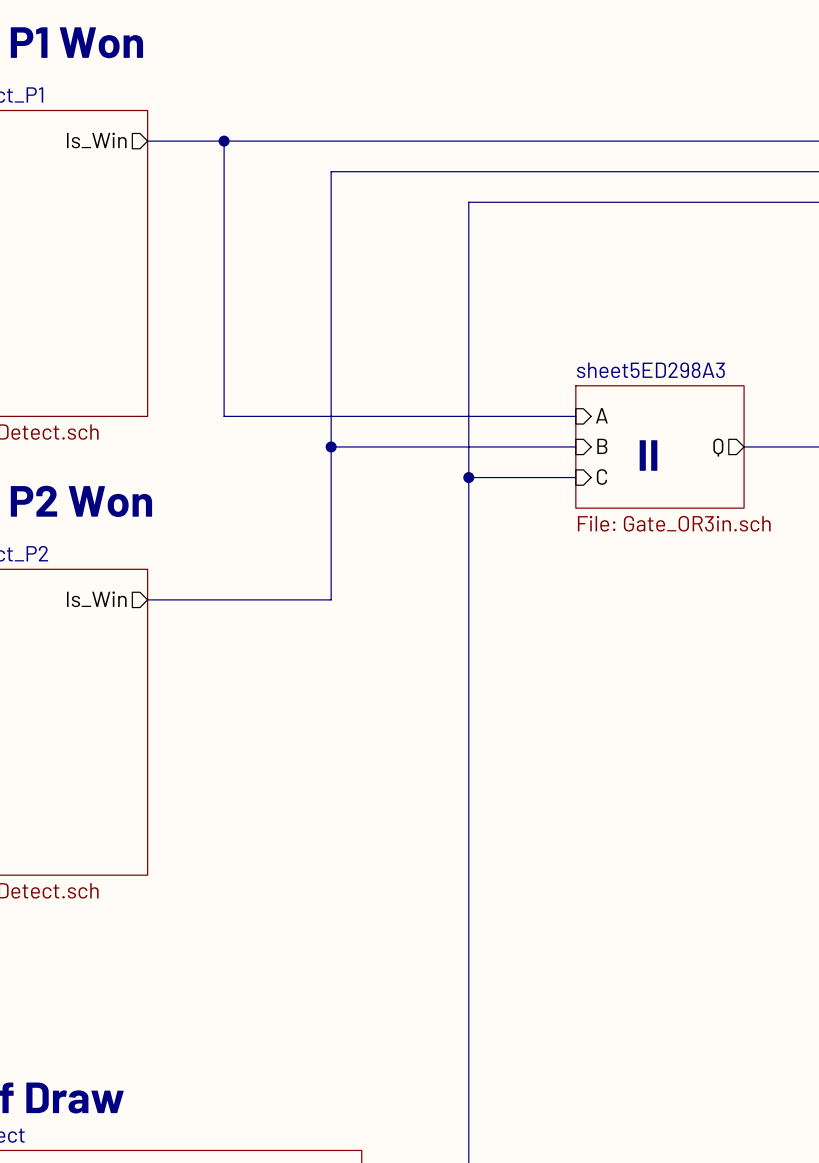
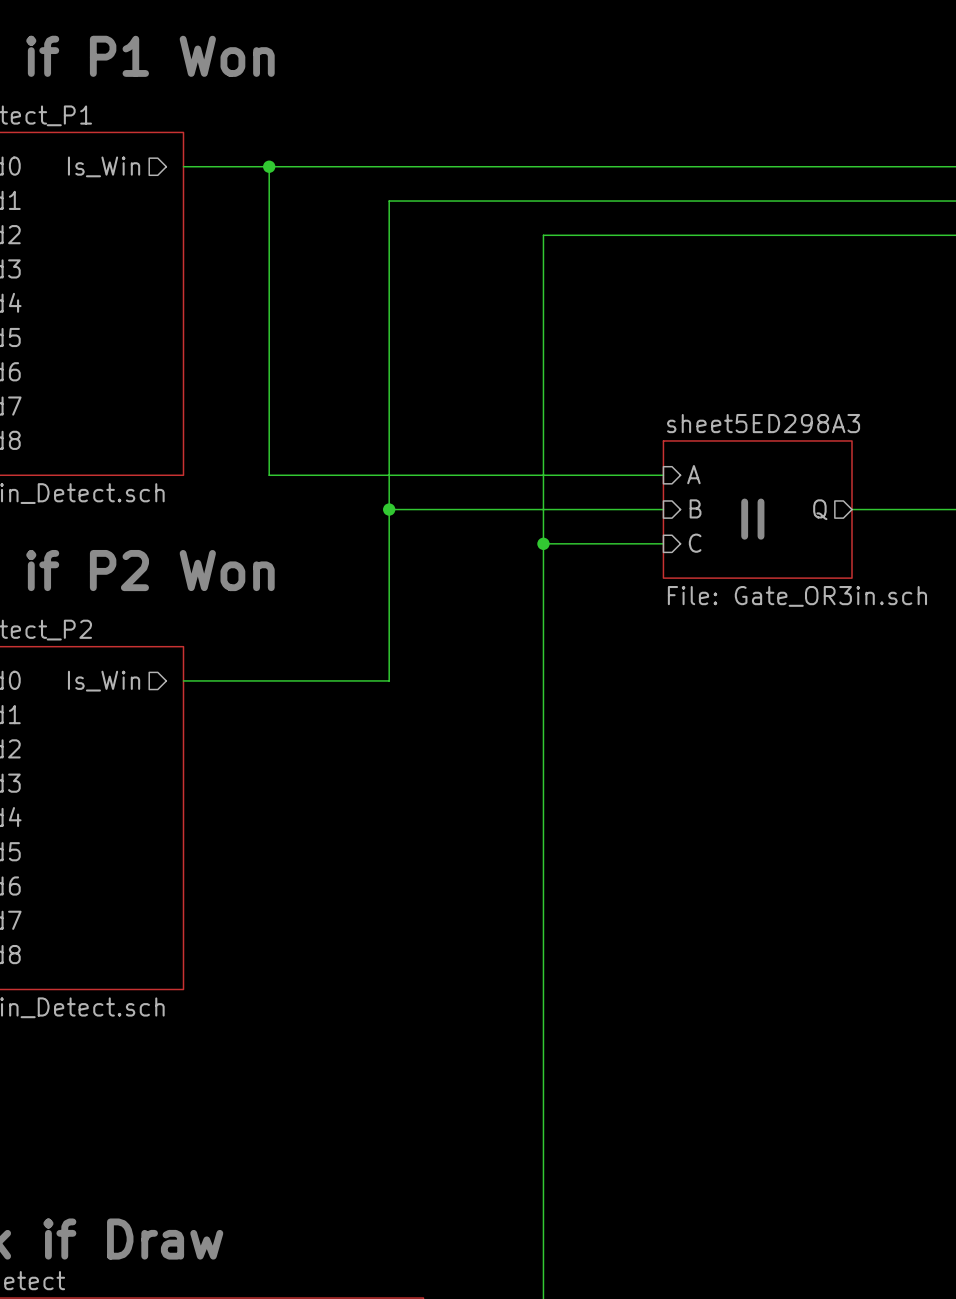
sheet pin position: Is_Win (96, 140) -> Is_Win (104, 166)
sheet pin position: Is_Win (96, 599) -> Is_Win (104, 681)

